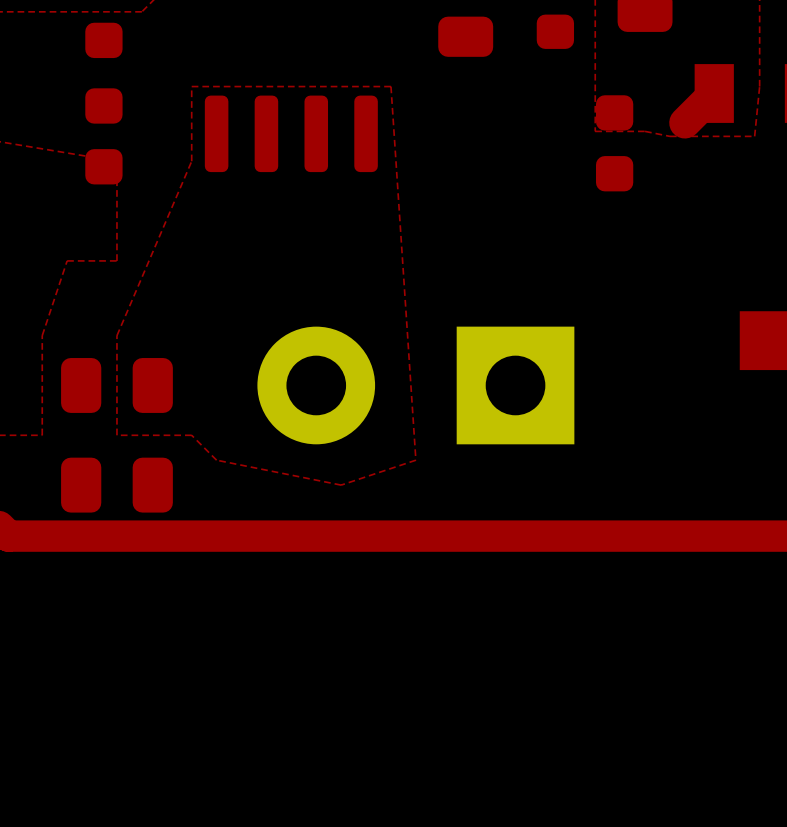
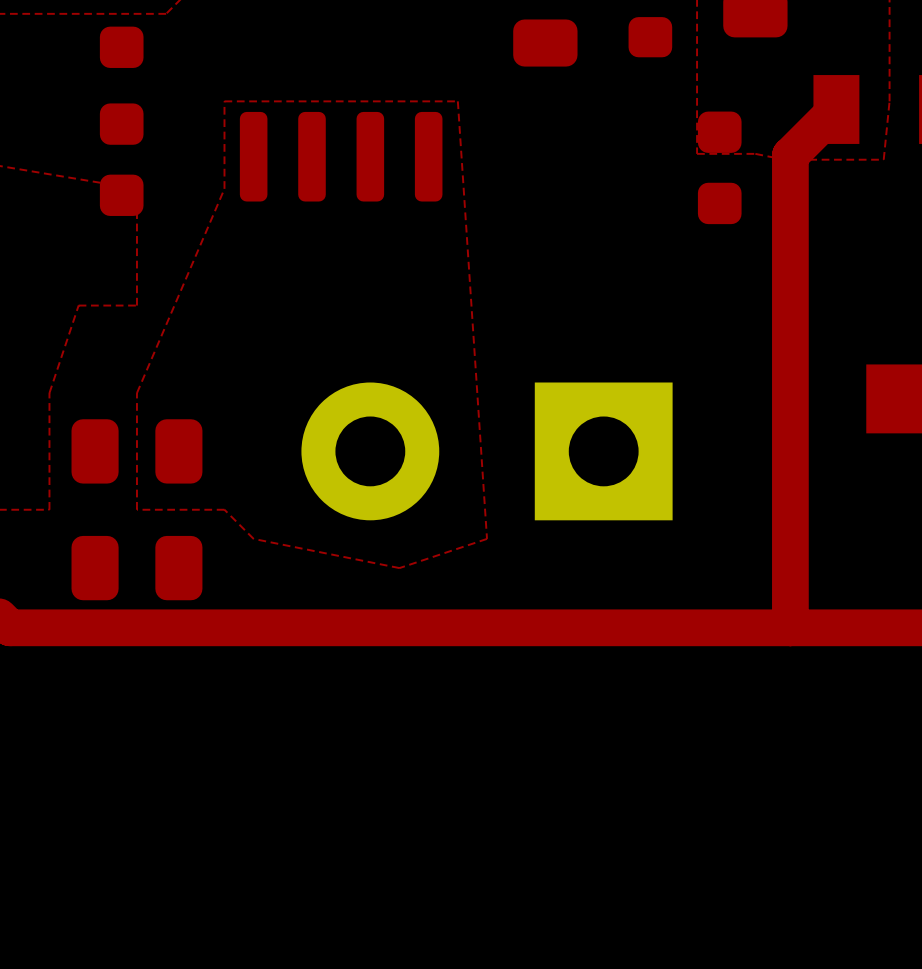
top track: none -> (802, 143) (790, 155) (790, 627)

